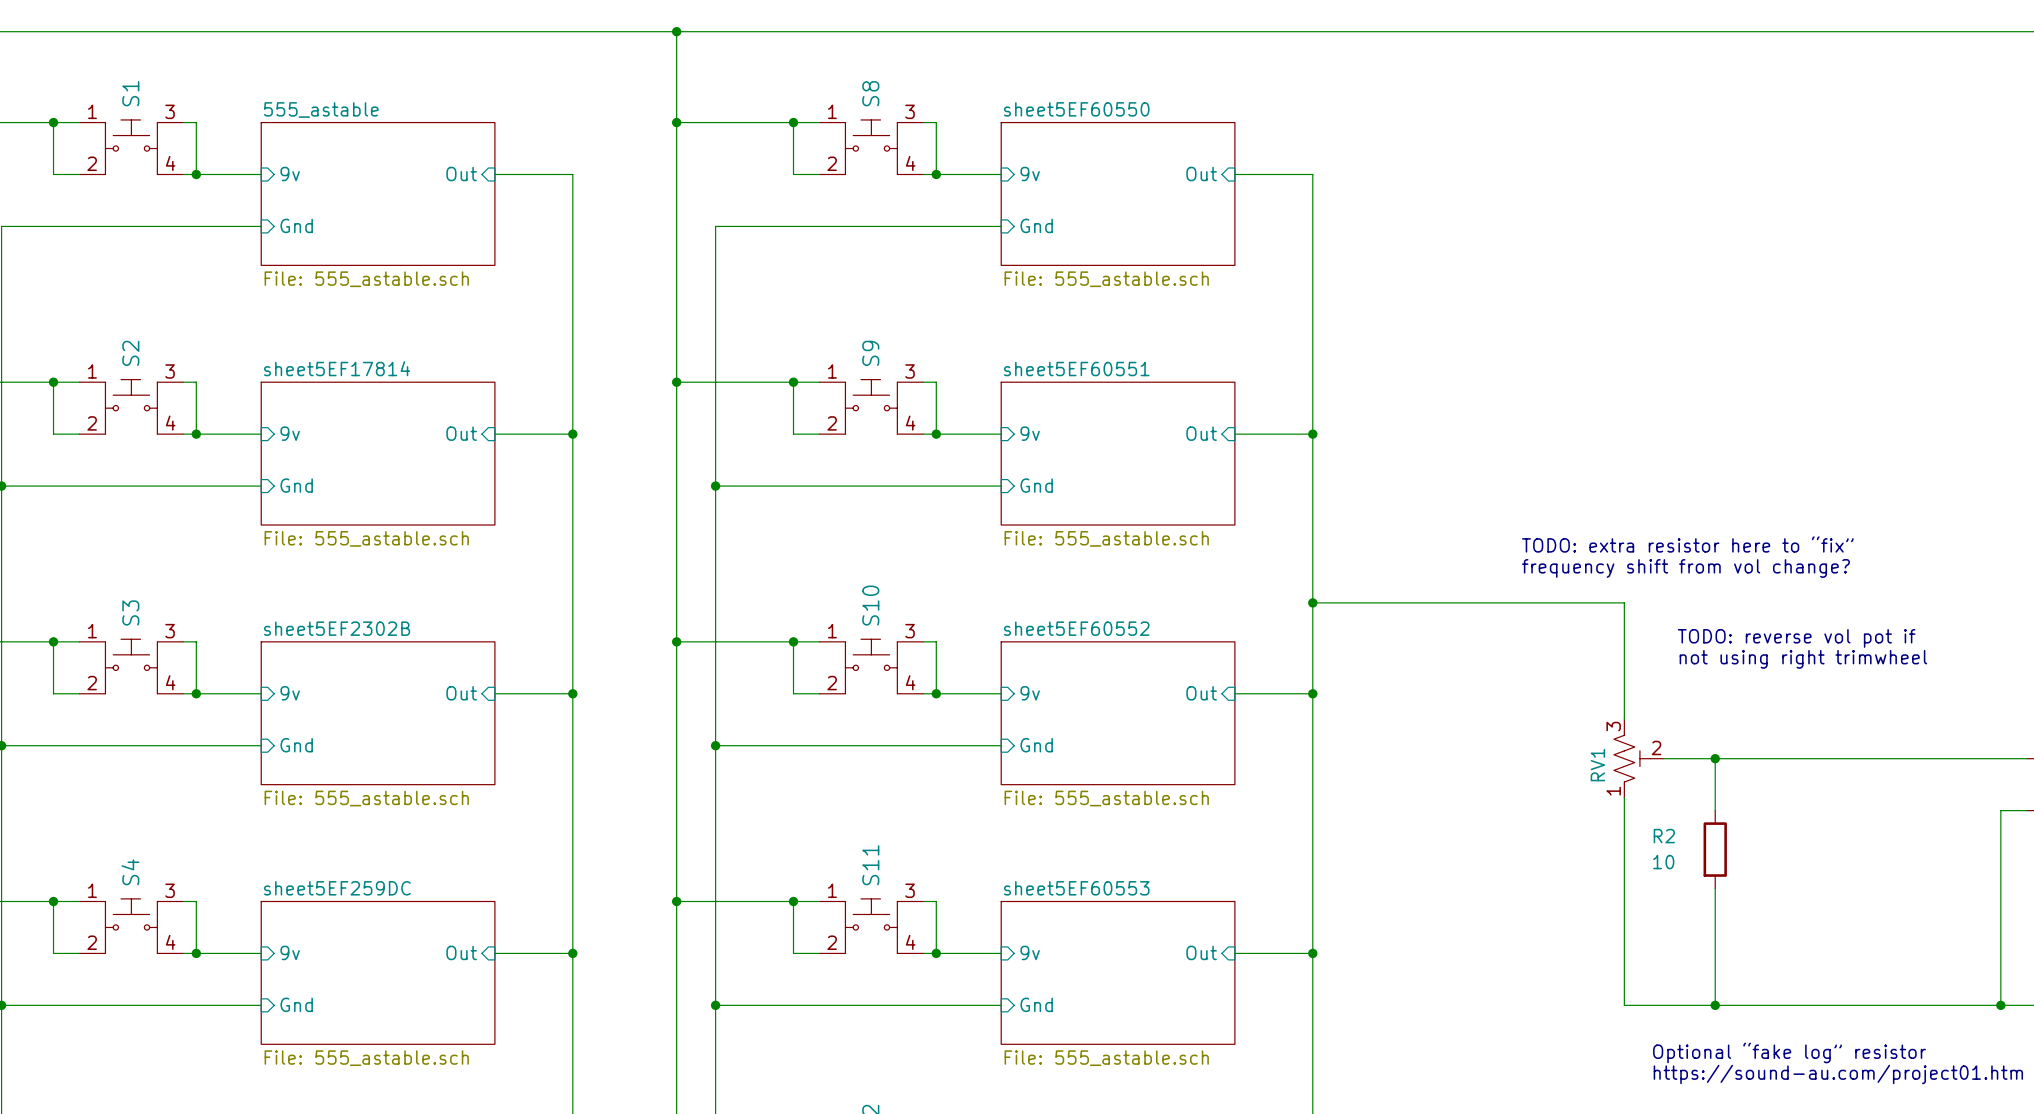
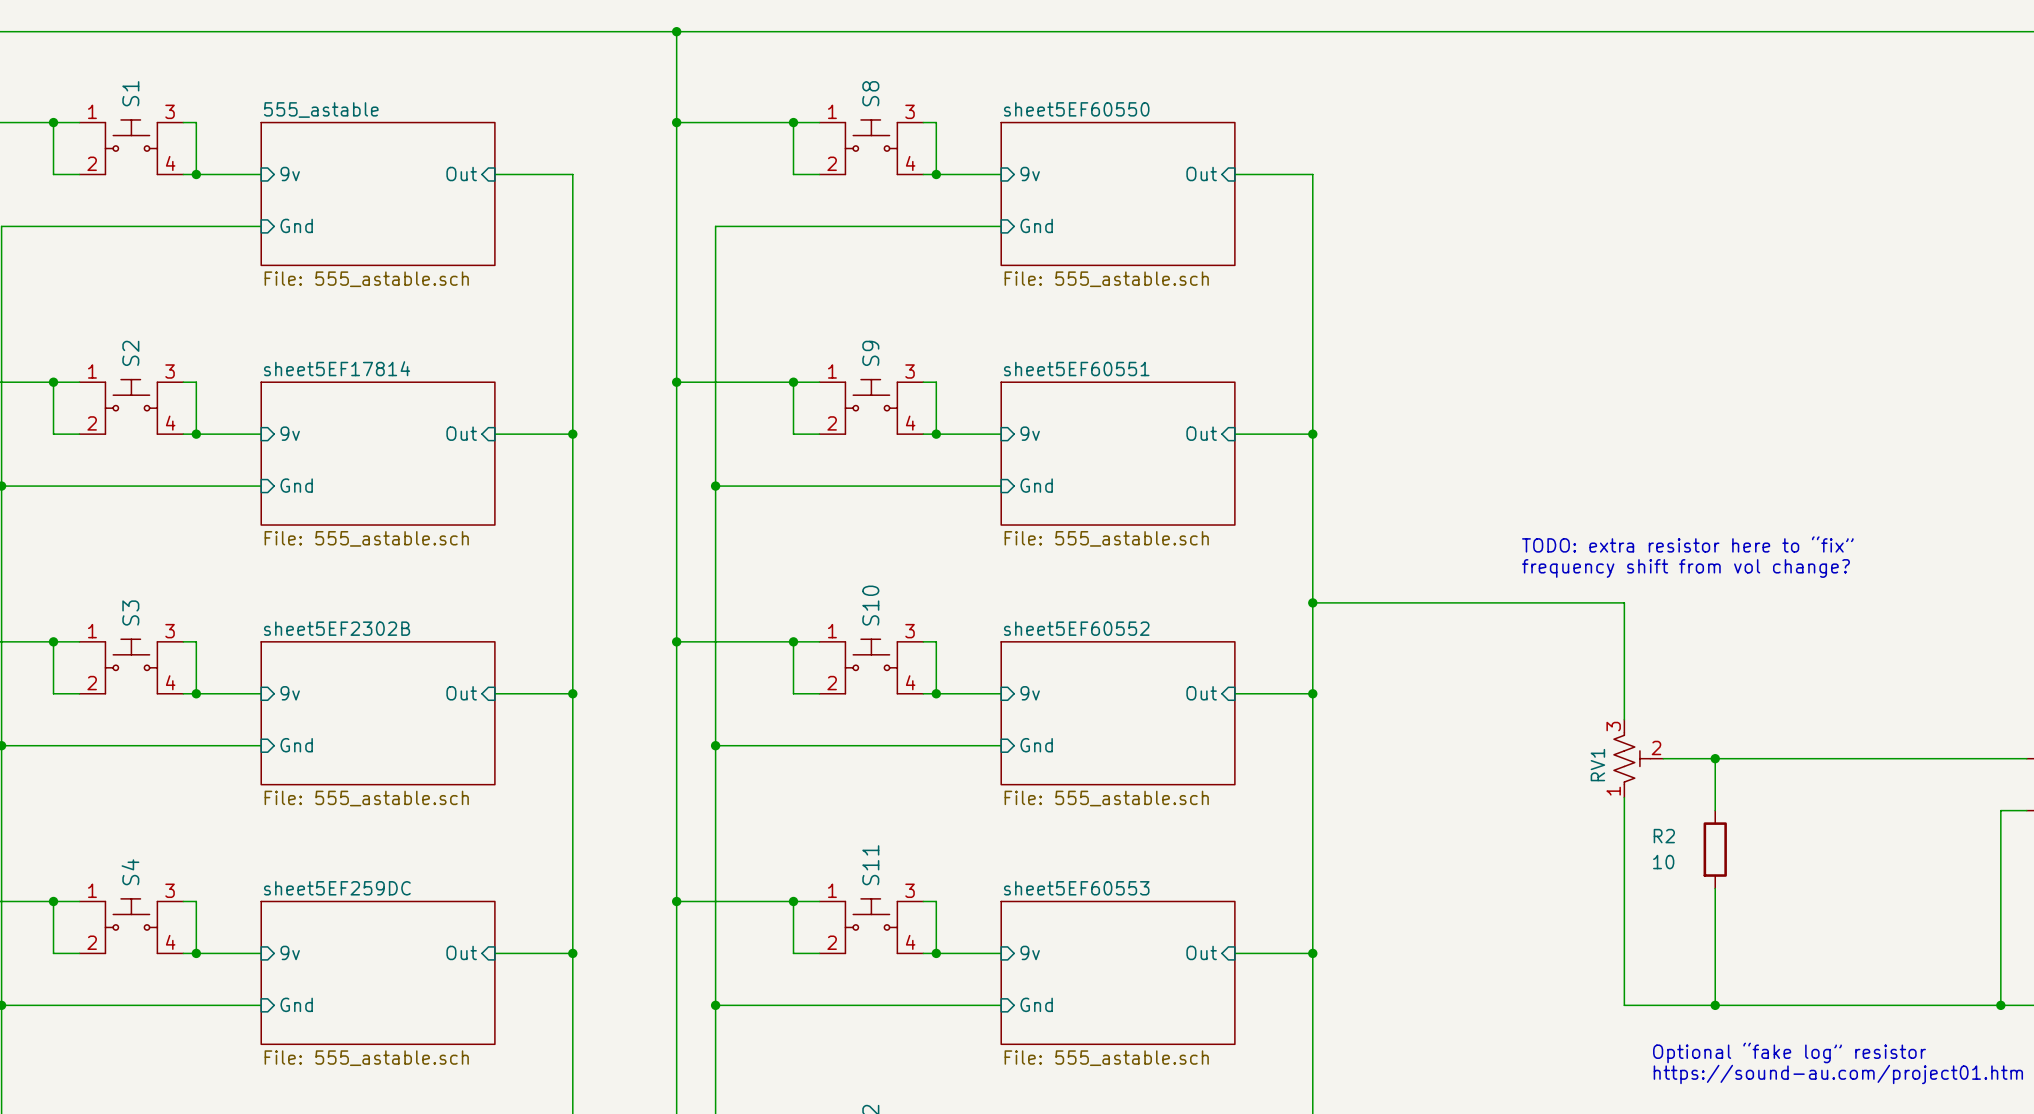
text: TODO: reverse vol pot if (1796, 638) -> none
text: not using right trimwheel (1803, 659) -> none

